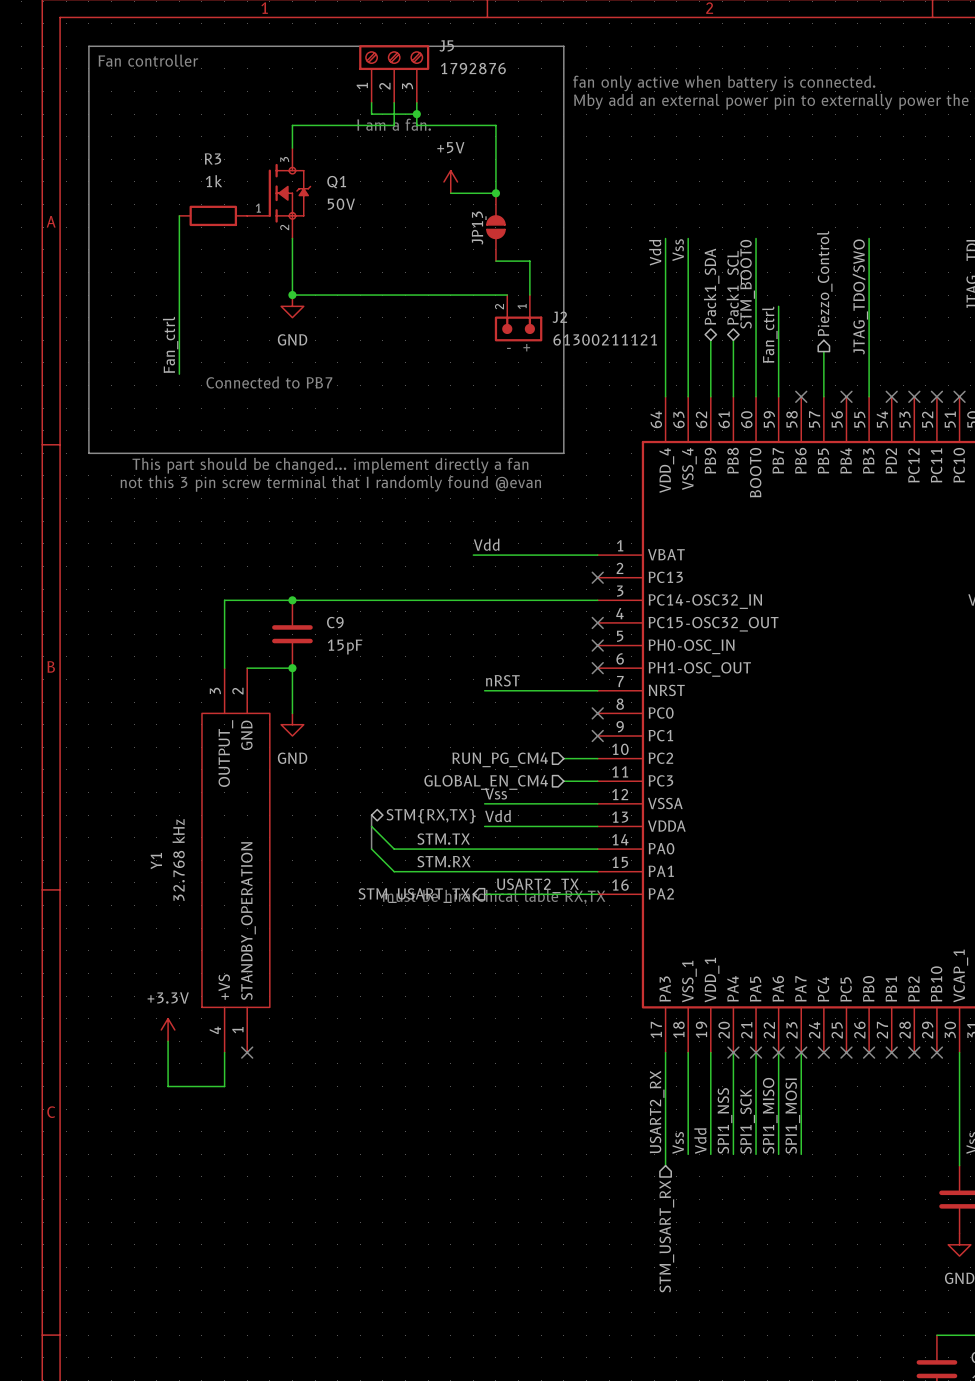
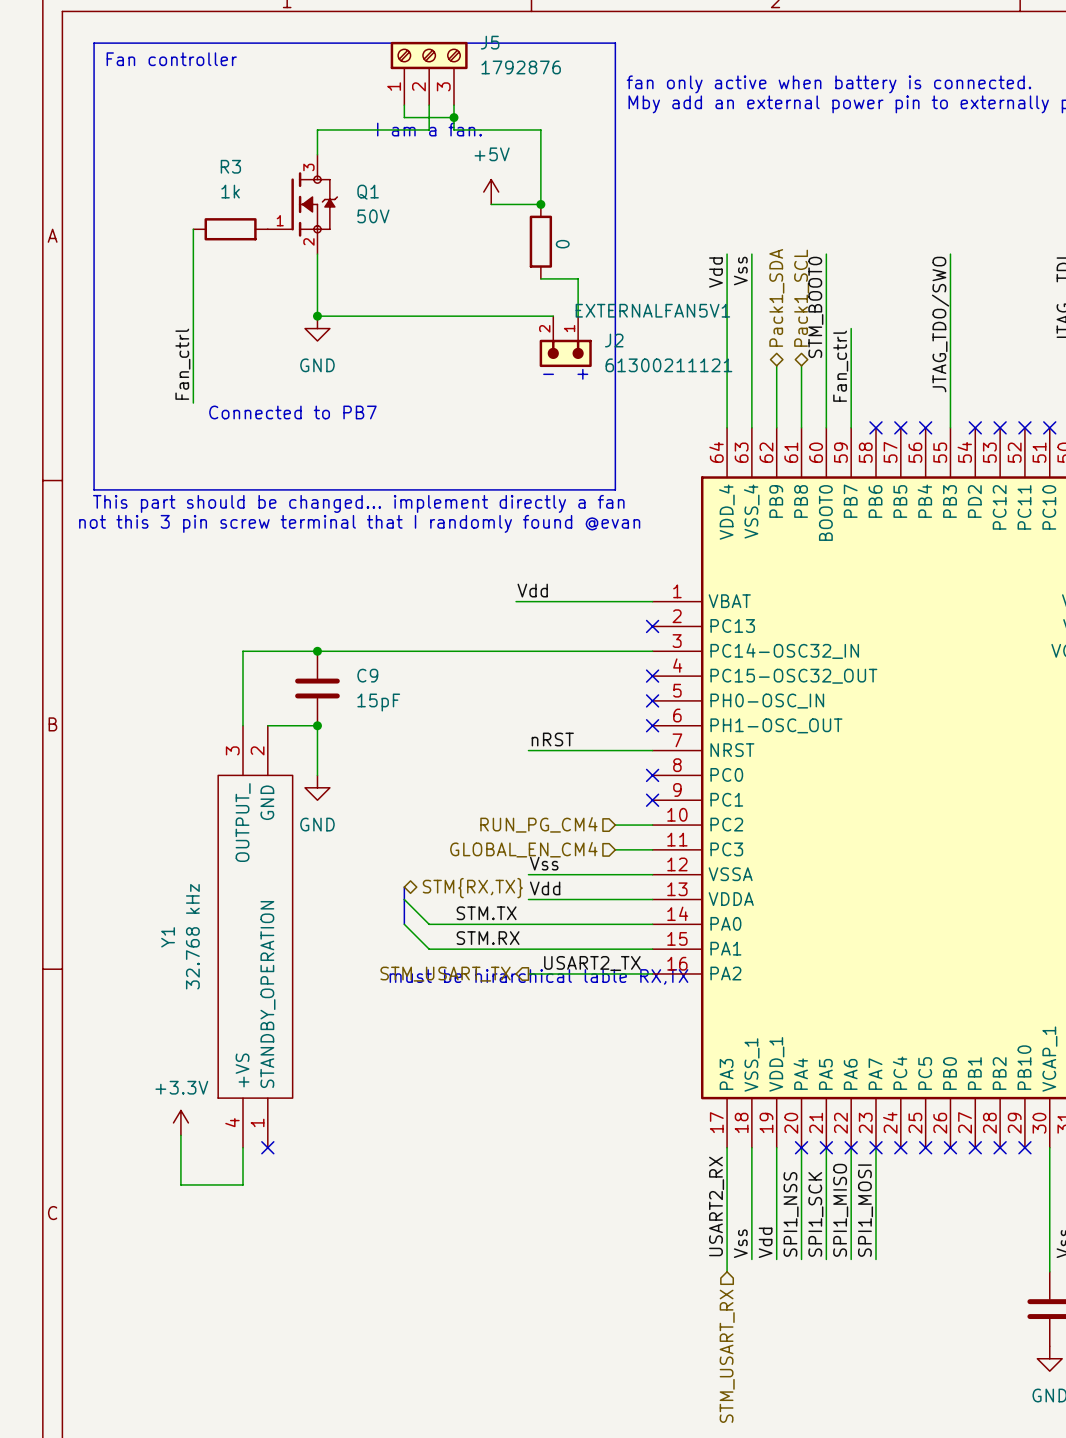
JP13: - (495, 227) -> none
EXTERNALFAN5V1: none -> 0 (540, 241)
hierarchical label: Piezzo_Control (824, 283) -> none
wire: (823, 351) (823, 396) -> none
no-connect mark: none -> (900, 427)

